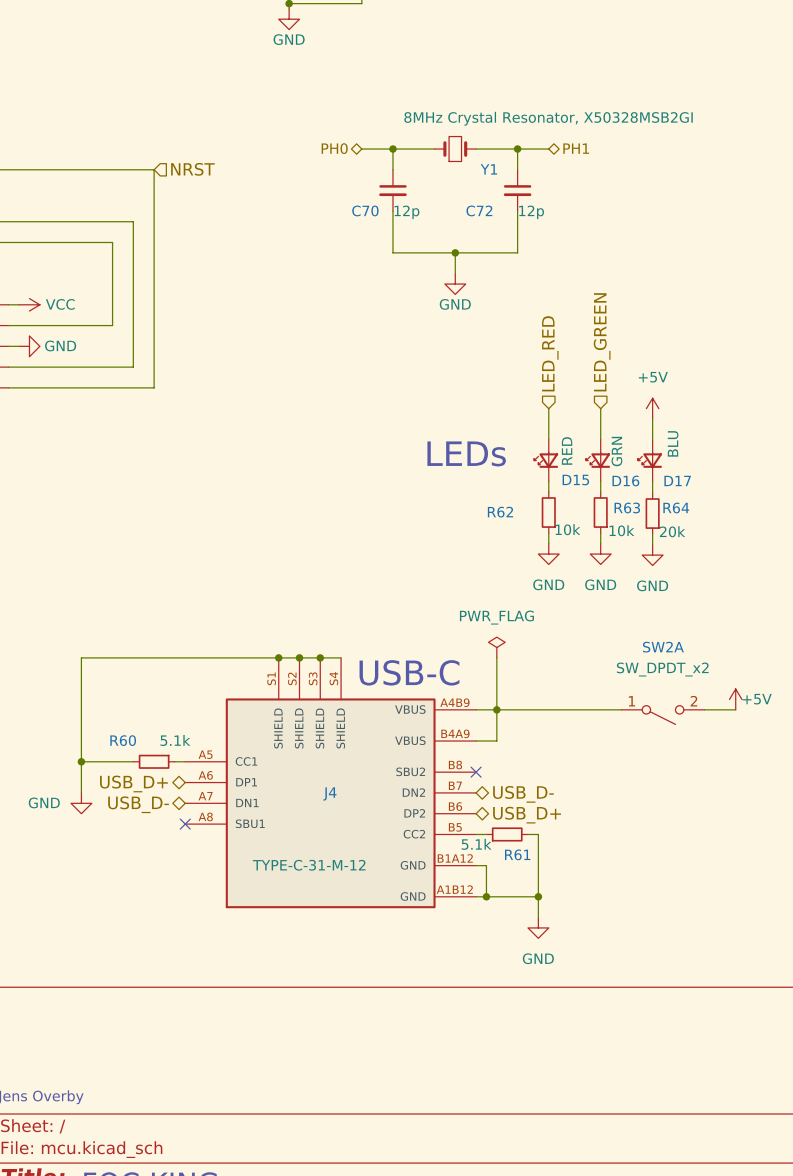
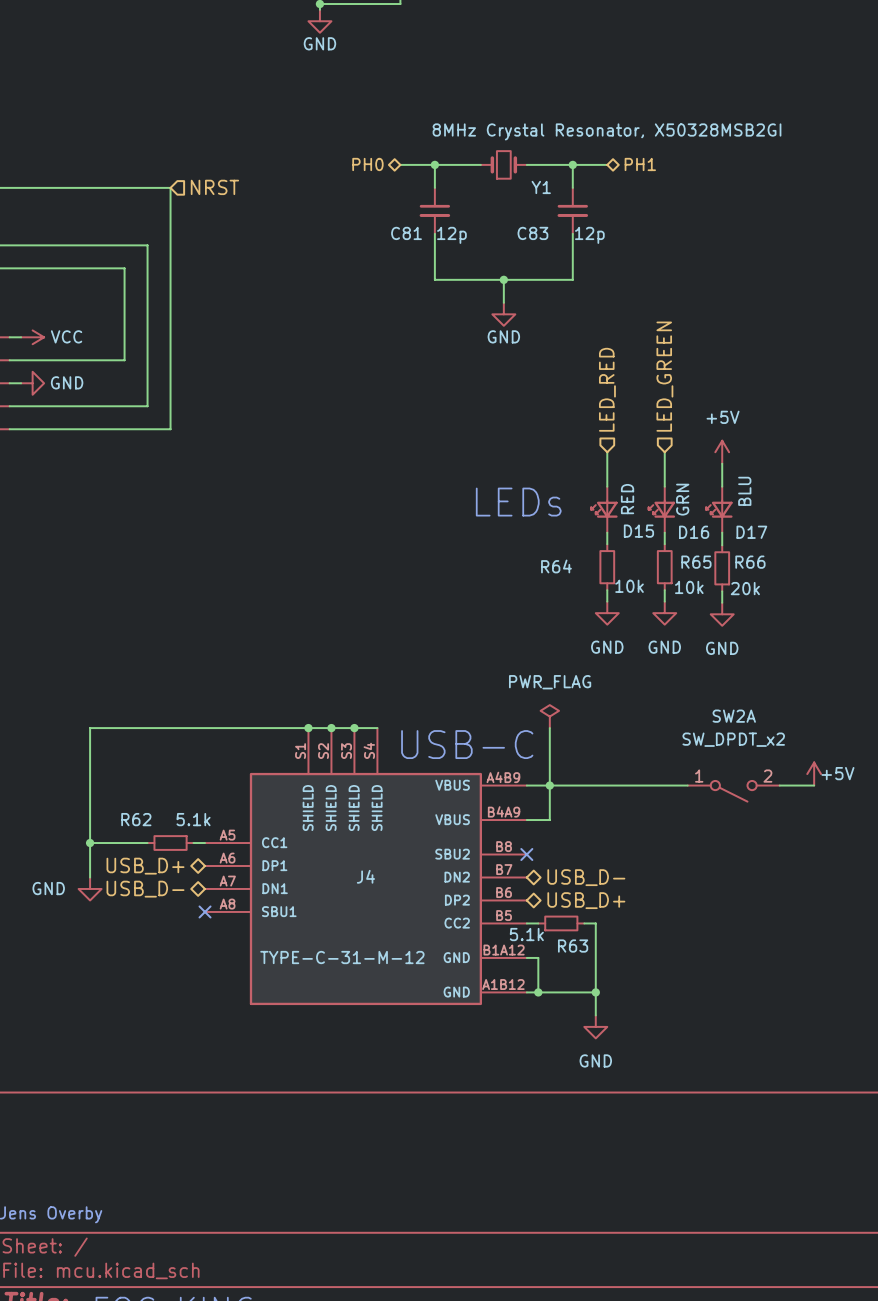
C70 name: C70 (365, 210) -> C81 (406, 233)
C72 name: C72 (479, 210) -> C83 (532, 233)
R63 name: R63 (627, 507) -> R65 (696, 562)
R64 name: R64 (676, 507) -> R66 (750, 562)
R62 name: R62 (500, 512) -> R64 (556, 566)
R60 name: R60 (123, 740) -> R62 (136, 819)
R61 name: R61 (517, 854) -> R63 (573, 946)

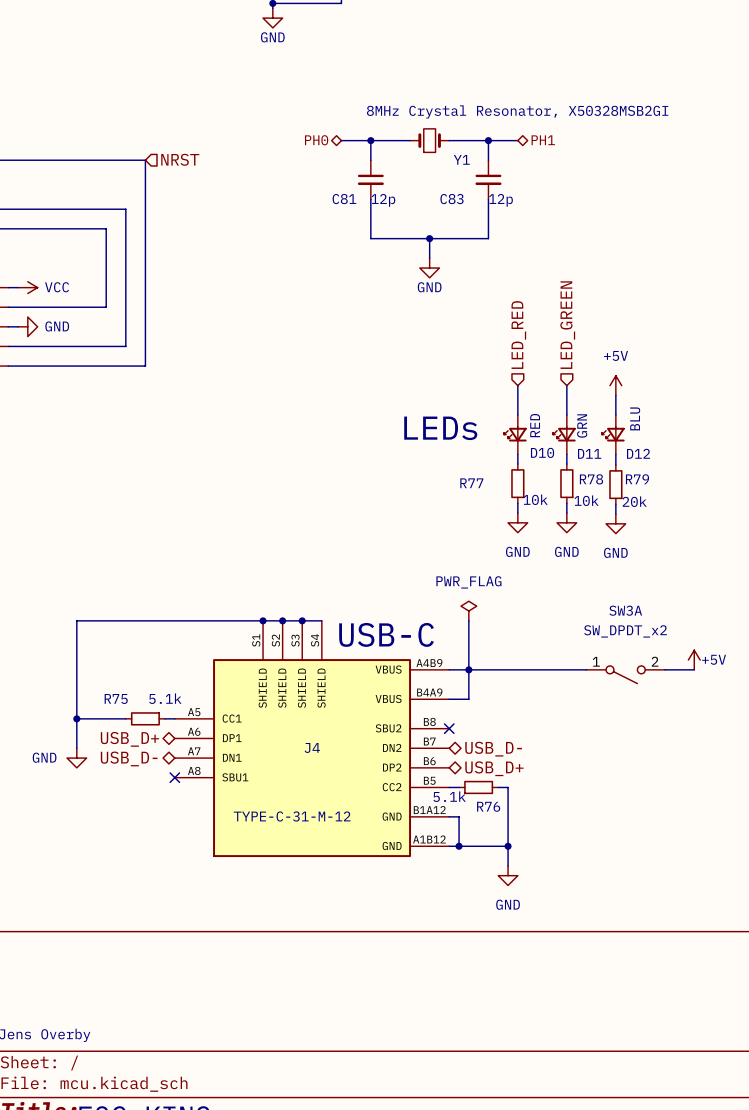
D15 name: D15 (638, 531) -> D10 (542, 452)
D16 name: D16 (694, 532) -> D11 (589, 453)
D17 name: D17 (751, 532) -> D12 (638, 453)
R65 name: R65 (696, 562) -> R78 (591, 479)
R66 name: R66 (750, 562) -> R79 (637, 479)
R64 name: R64 (556, 566) -> R77 (471, 483)
SW2A name: SW2A (734, 716) -> SW3A (625, 610)
R62 name: R62 (136, 819) -> R75 (116, 698)
R63 name: R63 (573, 946) -> R76 (488, 806)

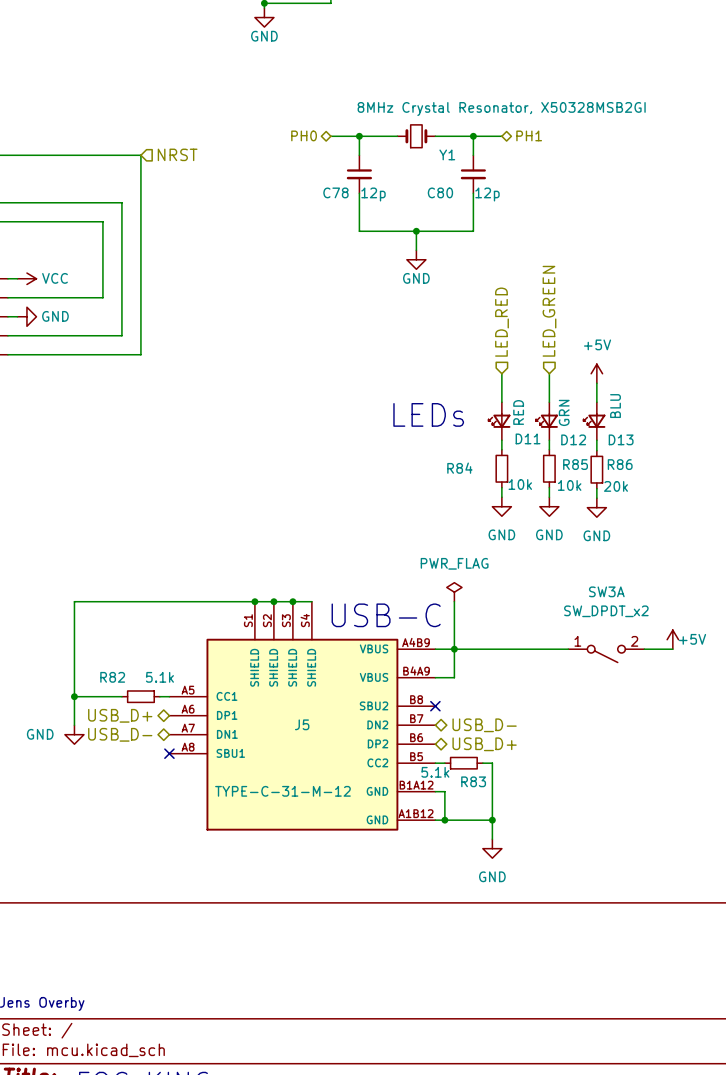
C81 name: C81 (344, 199) -> C78 (335, 192)
C83 name: C83 (452, 199) -> C80 (440, 192)
D10 name: D10 (542, 452) -> D11 (528, 438)
D11 name: D11 (589, 453) -> D12 (573, 439)
D12 name: D12 (638, 453) -> D13 (621, 439)
R78 name: R78 (591, 479) -> R85 (575, 464)
R79 name: R79 (637, 479) -> R86 (620, 464)
R77 name: R77 (471, 483) -> R84 (459, 468)
R75 name: R75 (116, 698) -> R82 (112, 677)
J4 name: J4 (312, 747) -> J5 (302, 724)
R76 name: R76 (488, 806) -> R83 (473, 781)

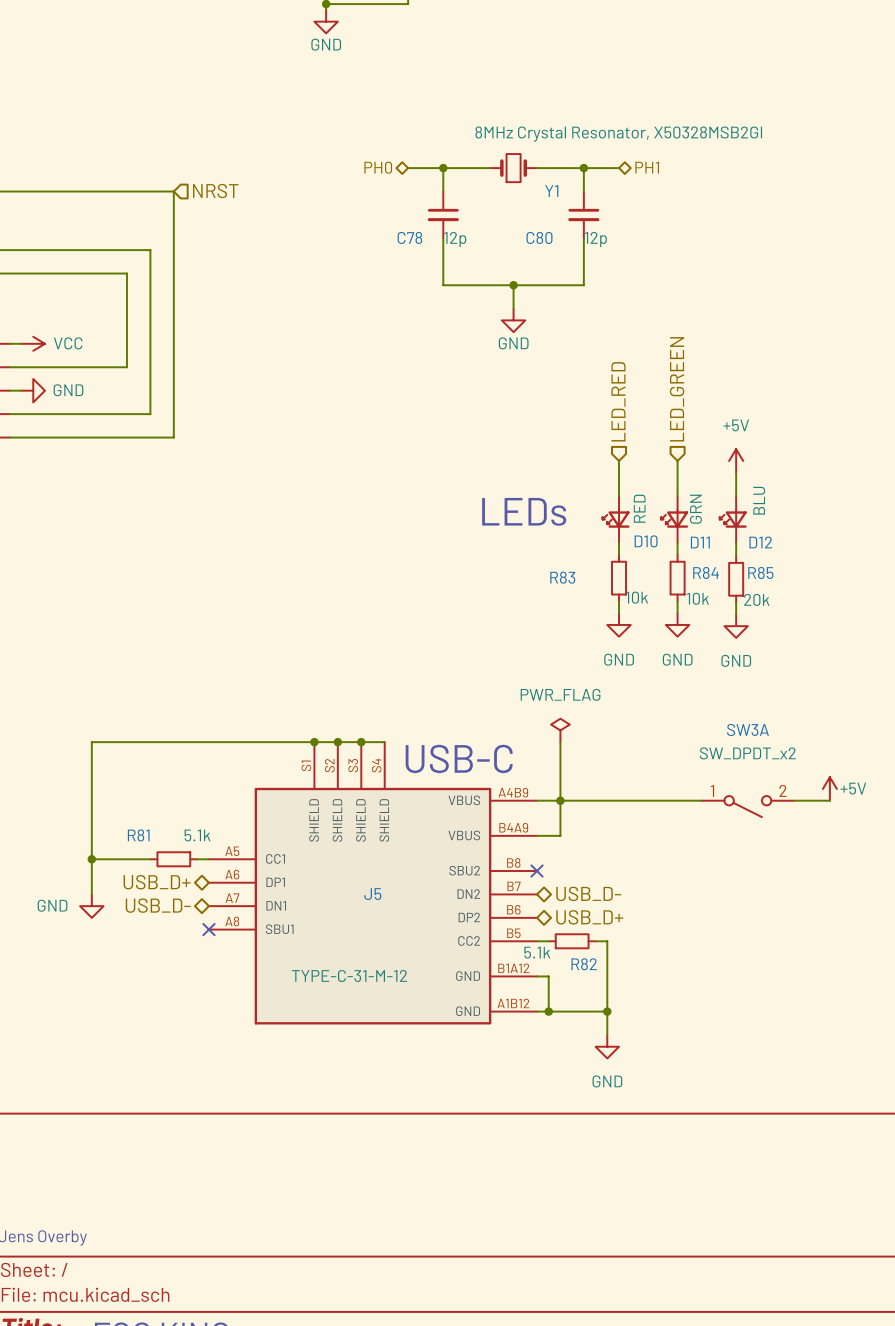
D11 name: D11 (528, 438) -> D10 (646, 541)
D12 name: D12 (573, 439) -> D11 (700, 542)
D13 name: D13 (621, 439) -> D12 (760, 542)
R85 name: R85 (575, 464) -> R84 (706, 572)
R86 name: R86 (620, 464) -> R85 (760, 572)
R84 name: R84 (459, 468) -> R83 (562, 577)
R82 name: R82 (112, 677) -> R81 (138, 835)
R83 name: R83 (473, 781) -> R82 (584, 964)

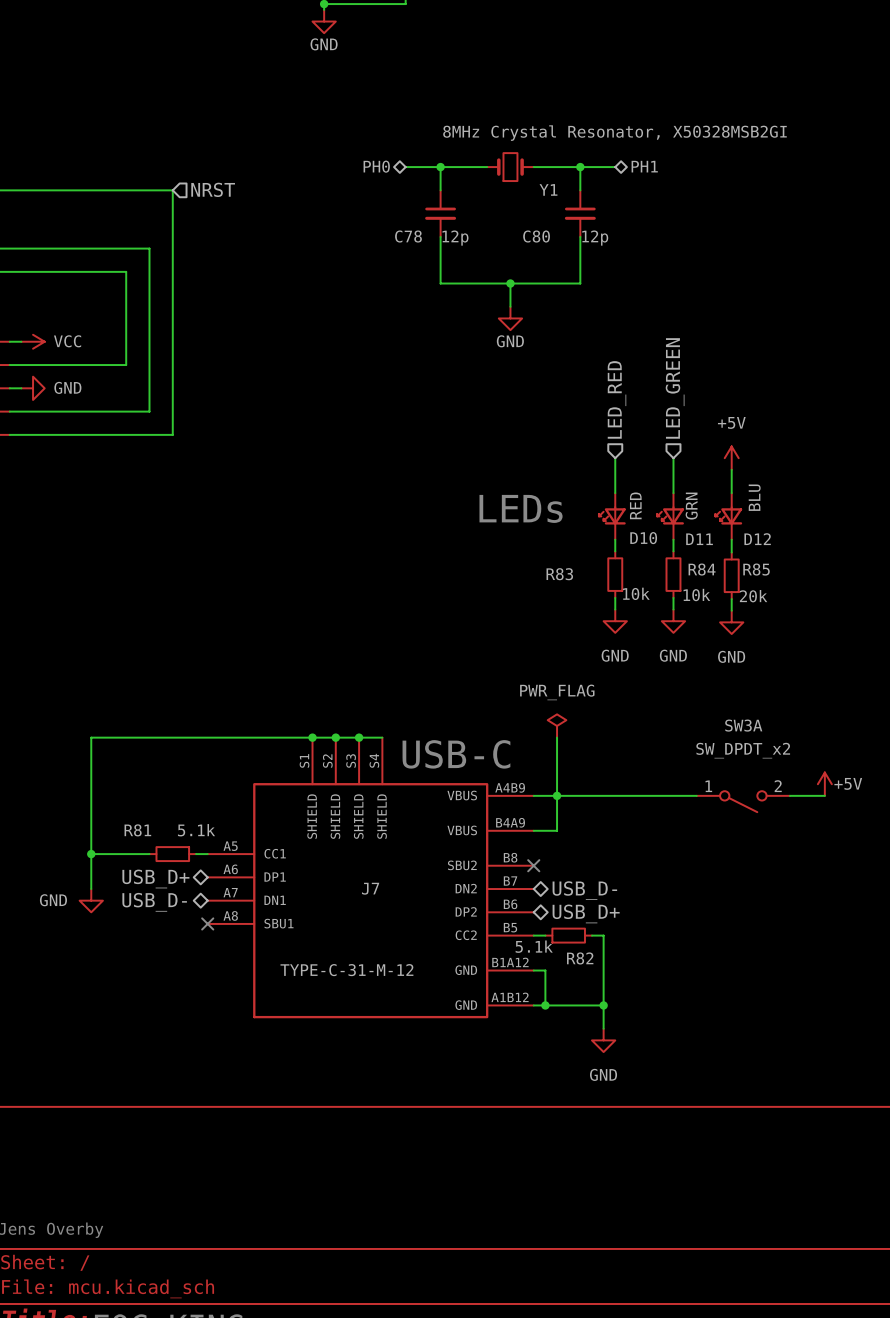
J5 name: J5 (372, 894) -> J7 (370, 888)

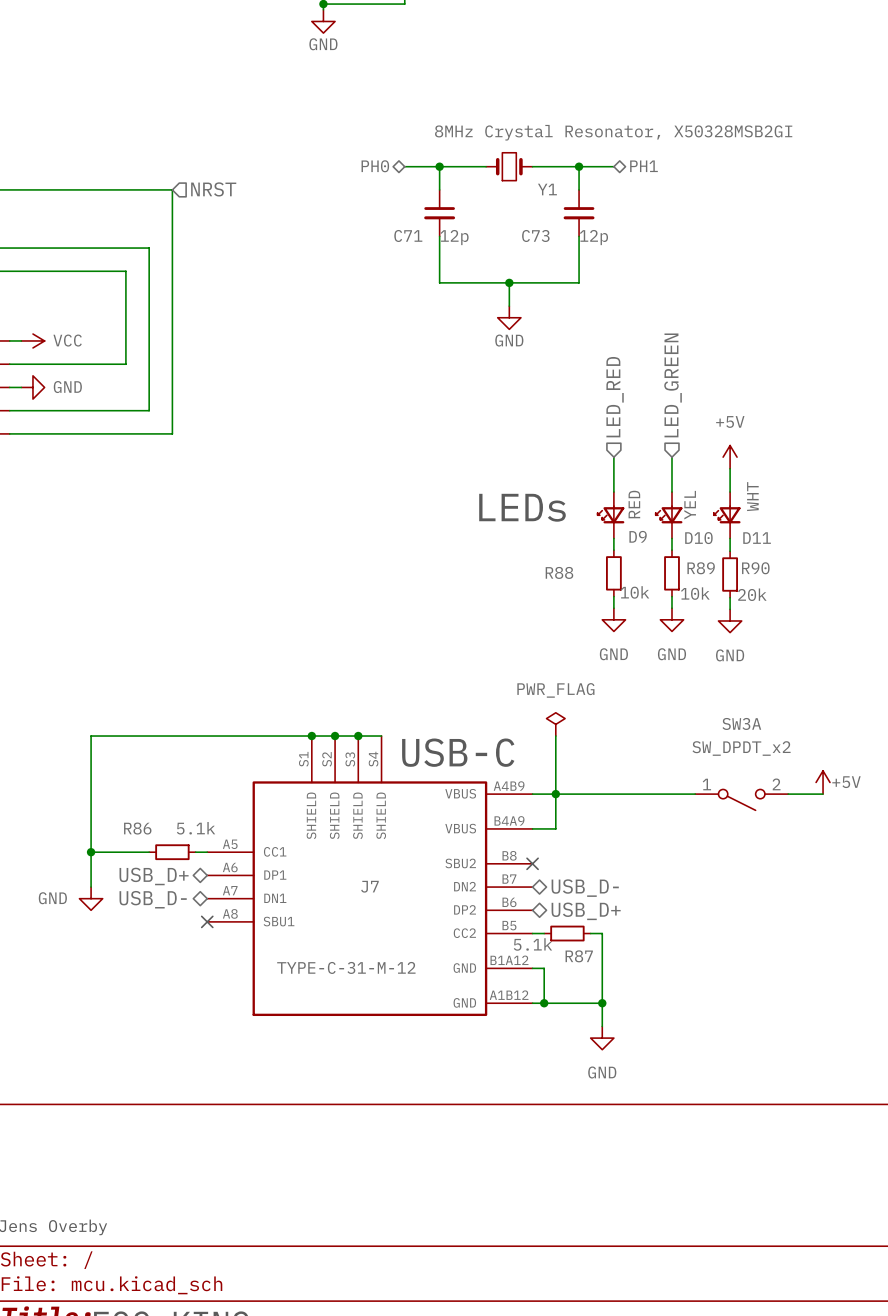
C78 name: C78 (408, 236) -> C71 (408, 235)
C80 name: C80 (536, 236) -> C73 (535, 235)
D12 value: BLU (754, 497) -> WHT (752, 496)
D11 value: GRN (691, 506) -> YEL (690, 505)
D10 name: D10 (643, 538) -> D9 (638, 536)
D11 name: D11 (699, 539) -> D10 (698, 538)
D12 name: D12 (757, 539) -> D11 (757, 538)
R84 name: R84 (702, 569) -> R89 (701, 568)
R85 name: R85 (756, 569) -> R90 (755, 568)
R83 name: R83 (559, 574) -> R88 (559, 572)
R81 name: R81 (137, 830) -> R86 (137, 828)
R82 name: R82 (580, 958) -> R87 (579, 956)

